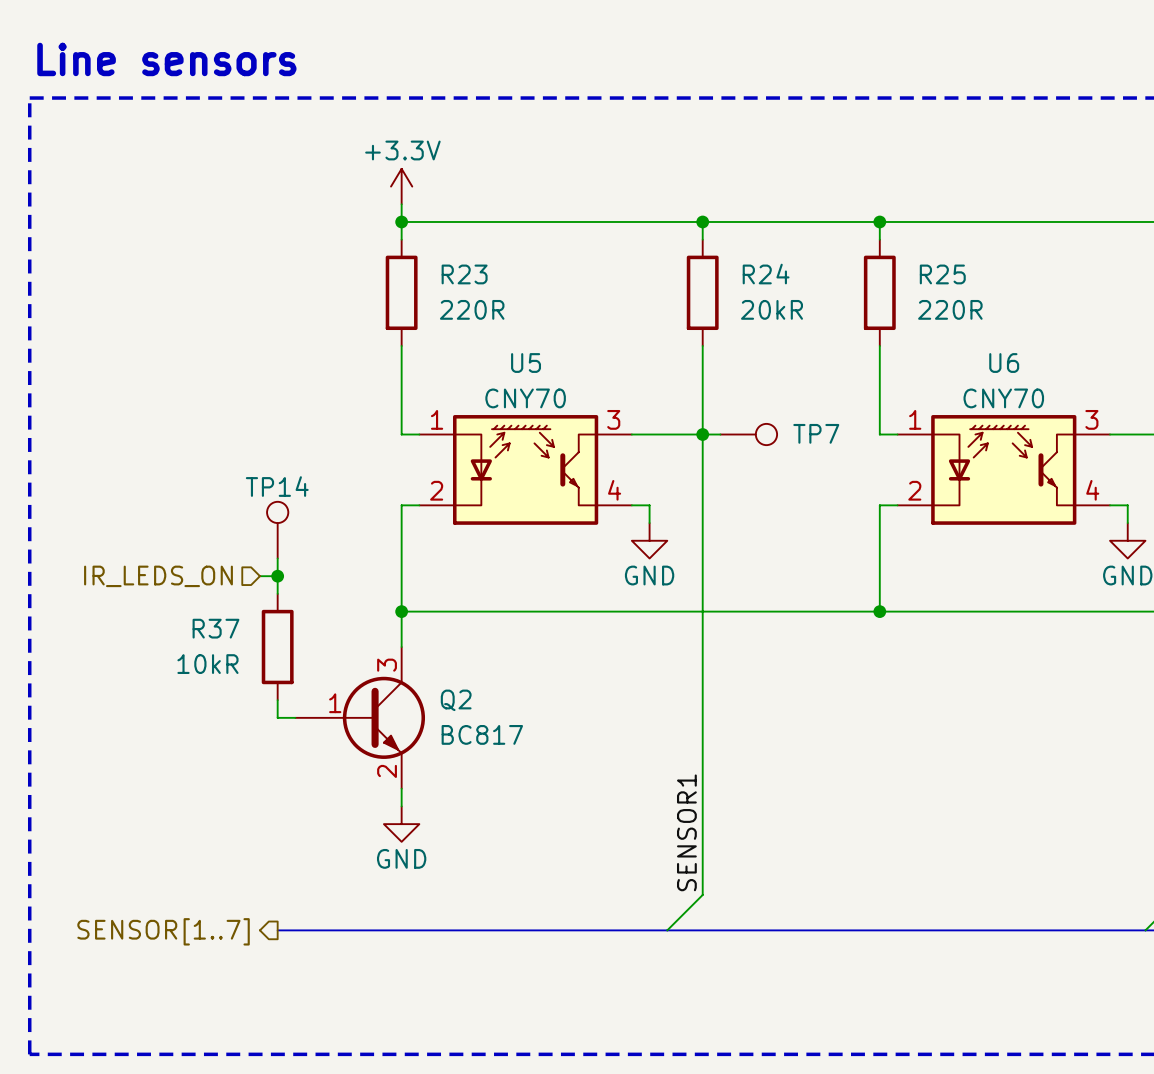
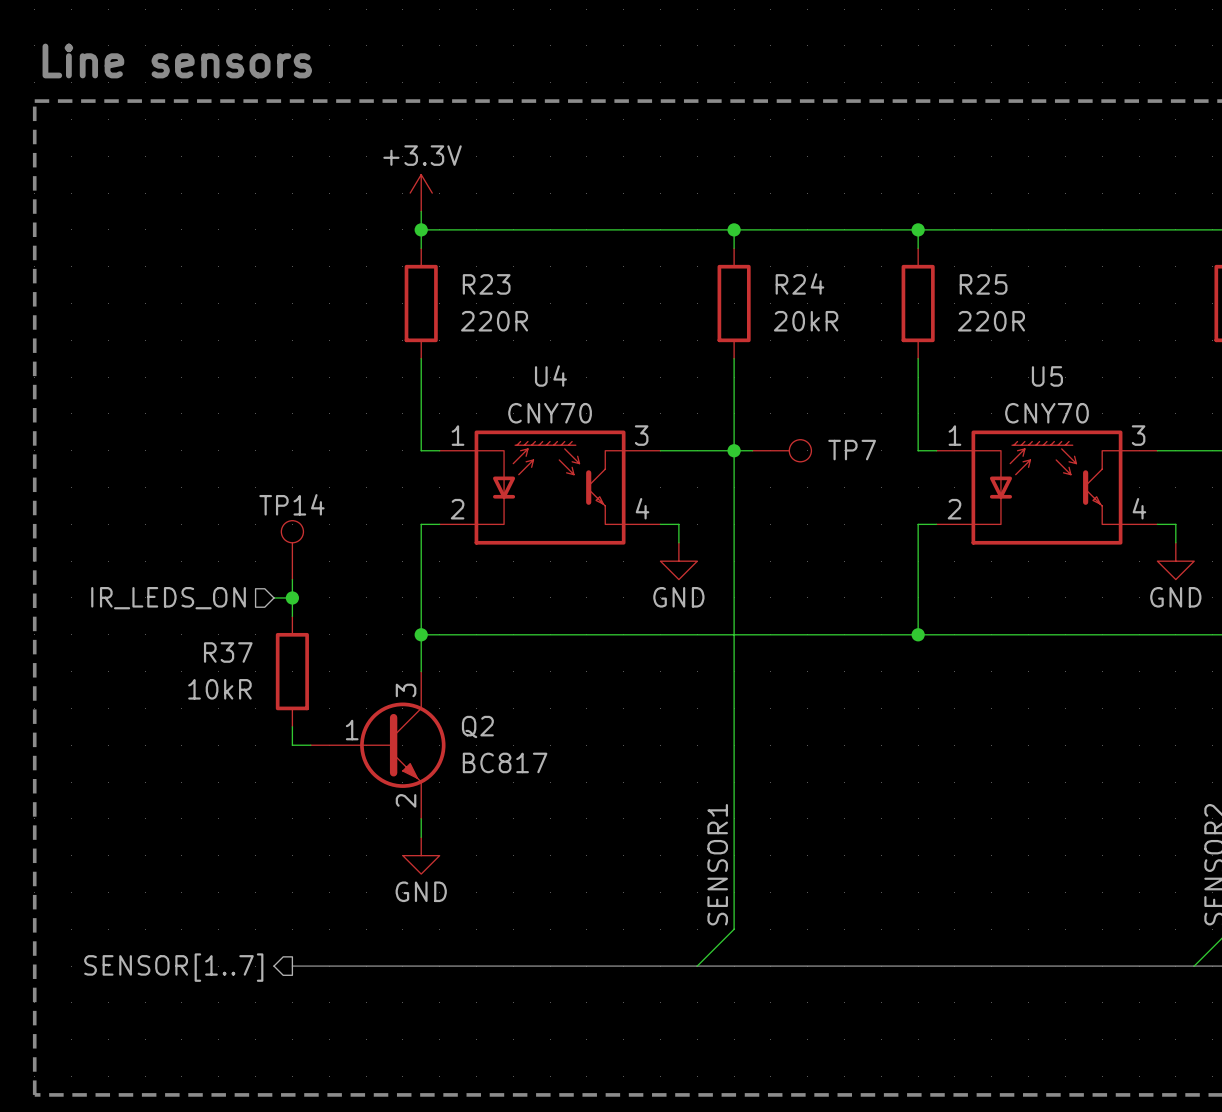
U5 name: U5 (526, 363) -> U4 (550, 376)
U6 name: U6 (1004, 363) -> U5 (1047, 376)

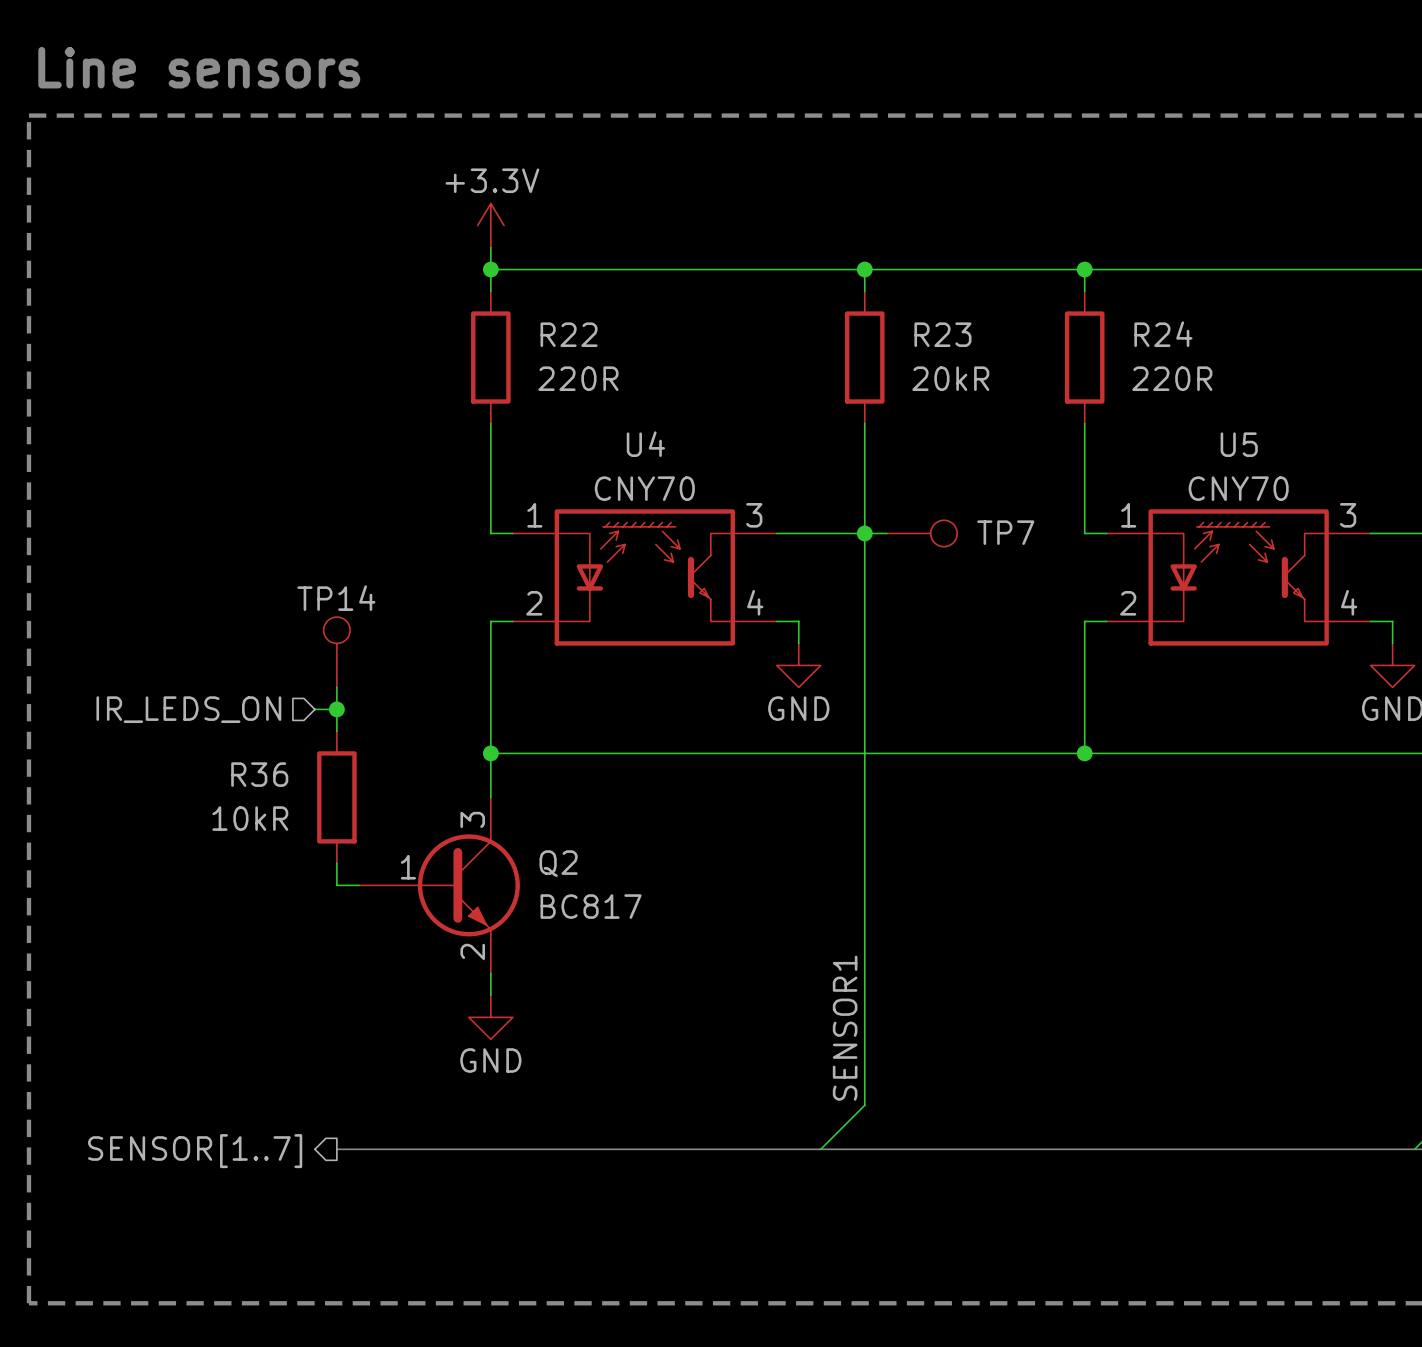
R24 name: R24 (799, 283) -> R23 (942, 334)
R23 name: R23 (486, 284) -> R22 (569, 334)
R25 name: R25 (983, 284) -> R24 (1163, 334)
R37 name: R37 (228, 652) -> R36 (259, 774)

